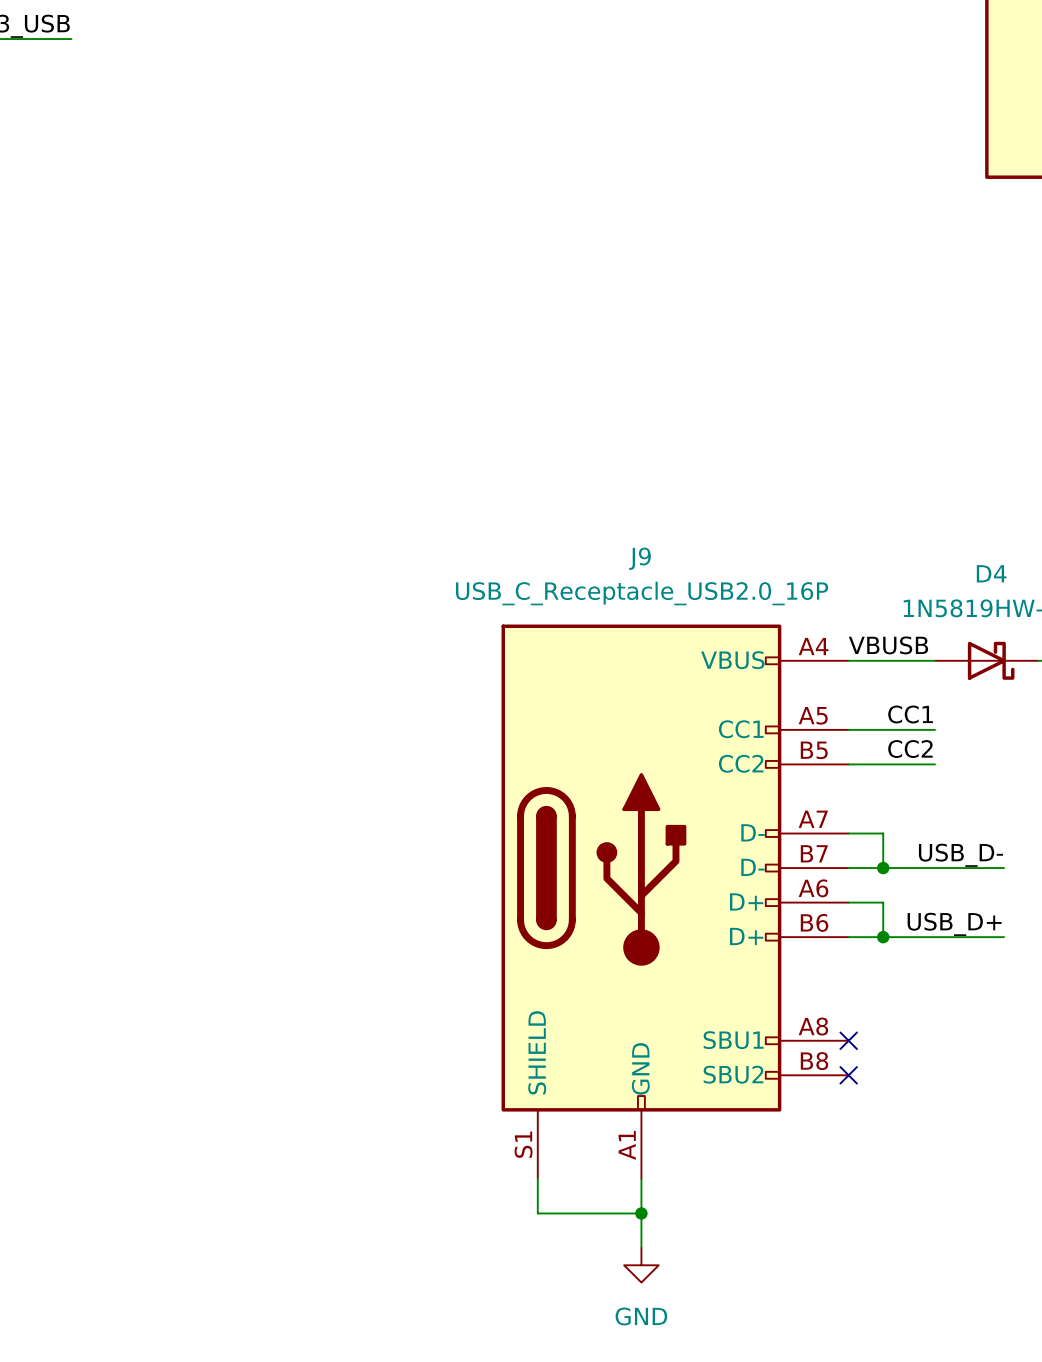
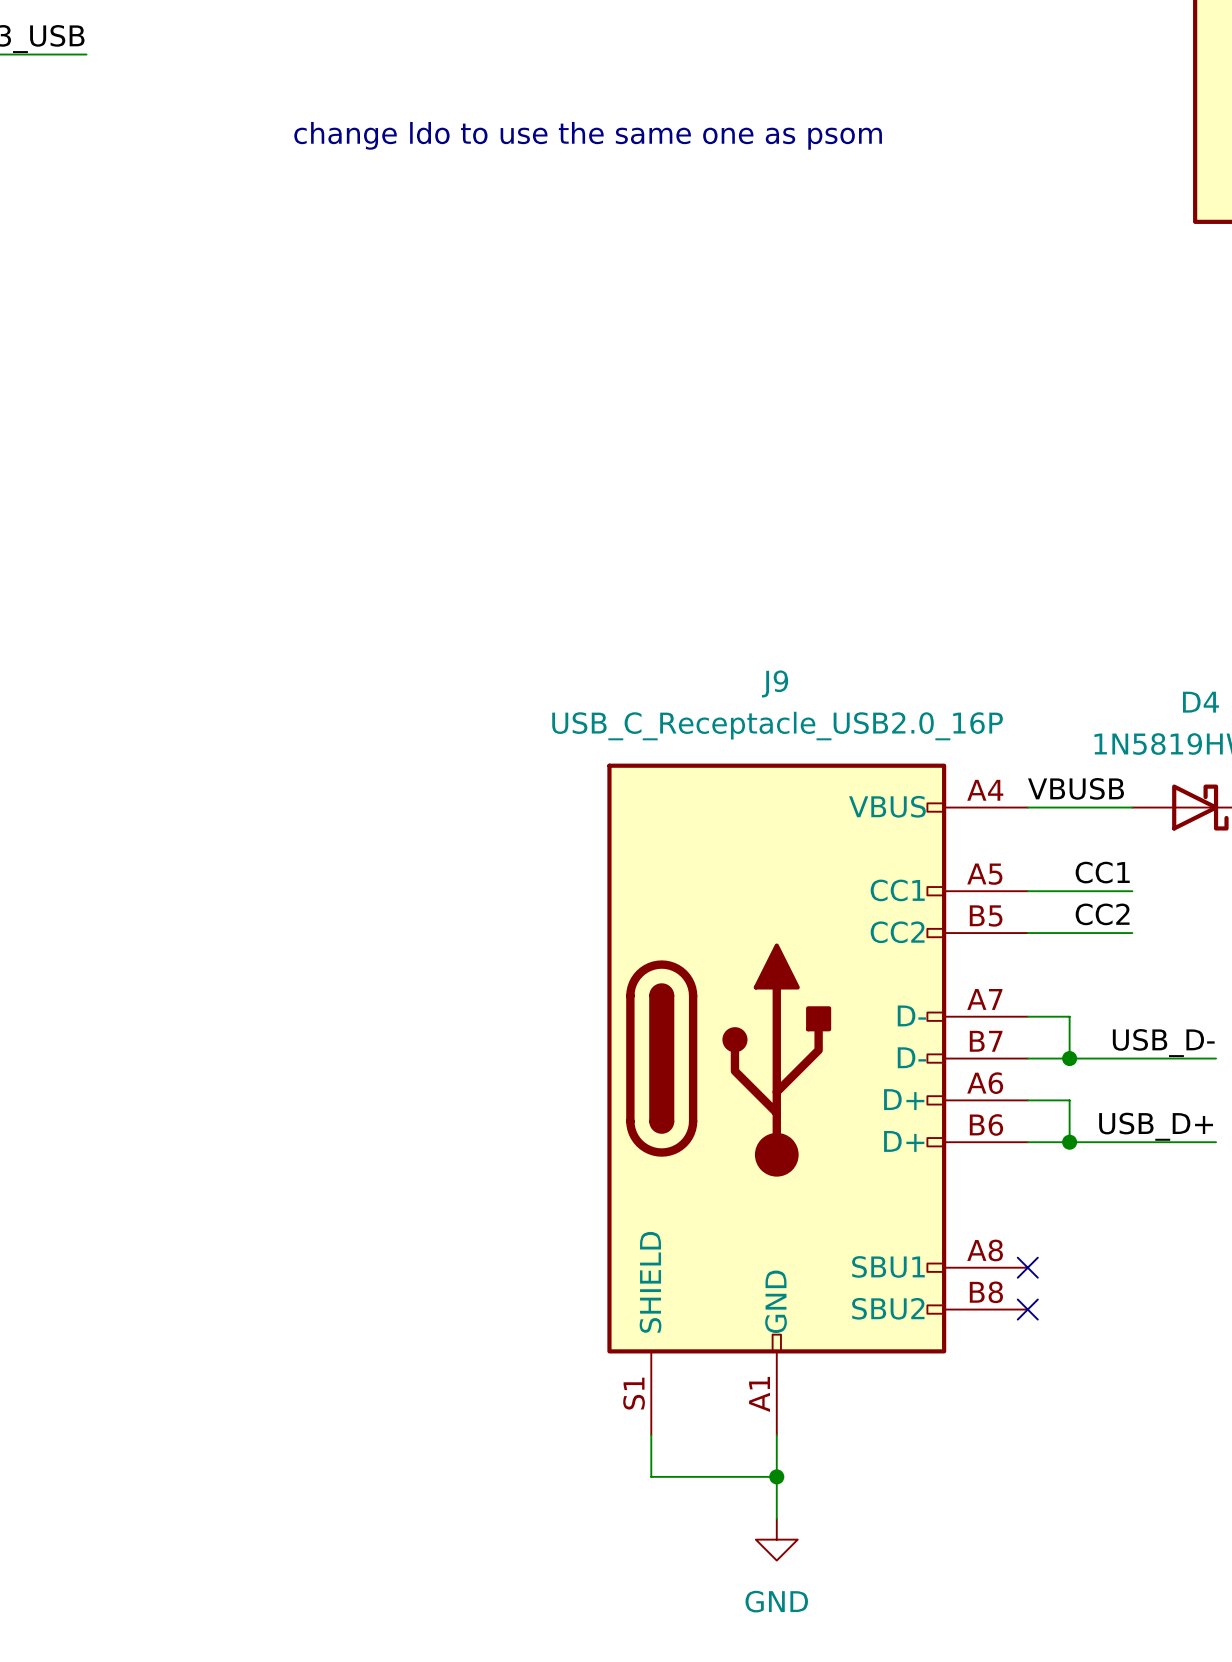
text: none -> change ldo to use the same one as psom (588, 135)

